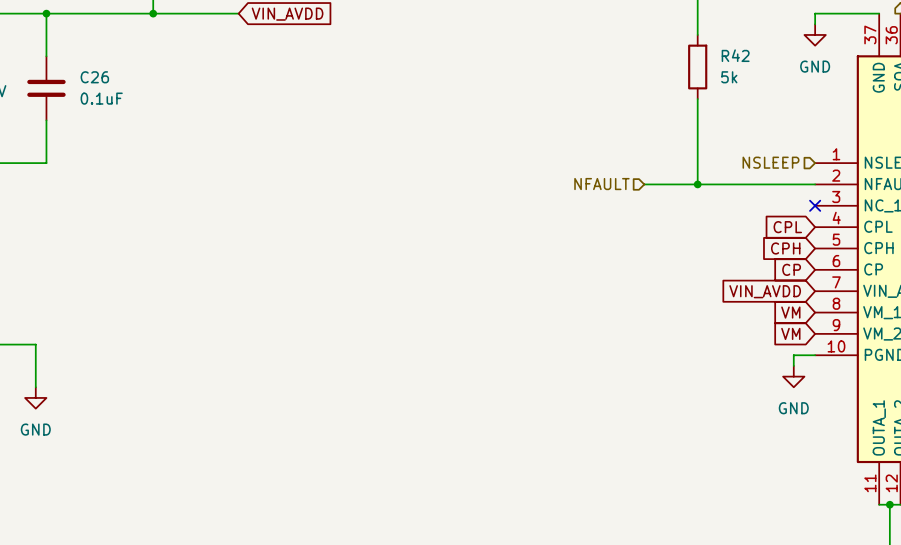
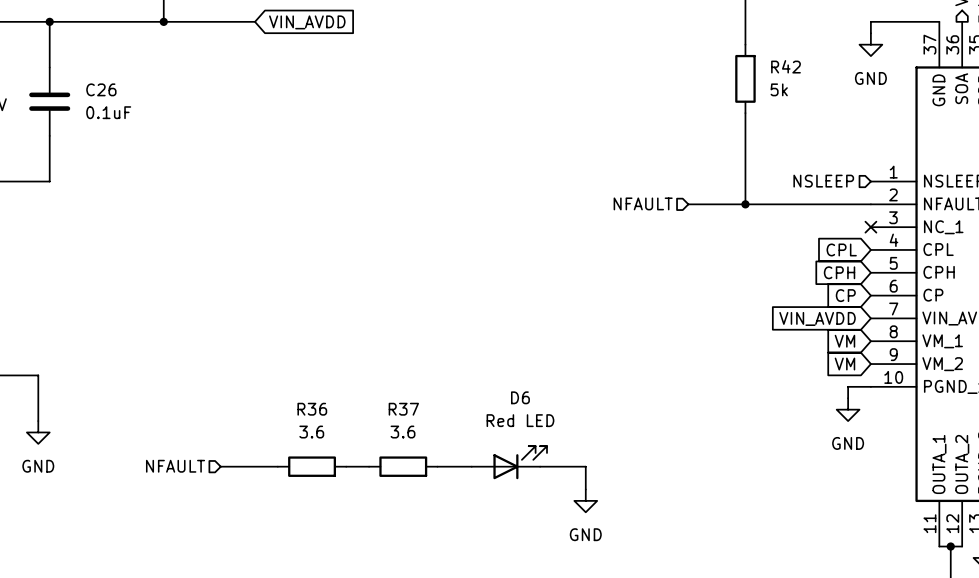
D6: none -> Red LED (509, 462)
hierarchical label: none -> NFAULT (175, 466)
wire: none -> (220, 466) (277, 466)
R36: none -> 3.6 (312, 466)
wire: none -> (346, 466) (369, 466)
R37: none -> 3.6 (403, 466)
wire: none -> (437, 466) (471, 466)
wire: none -> (540, 466) (585, 466) (585, 489)
power symbol: none -> GND (585, 500)

